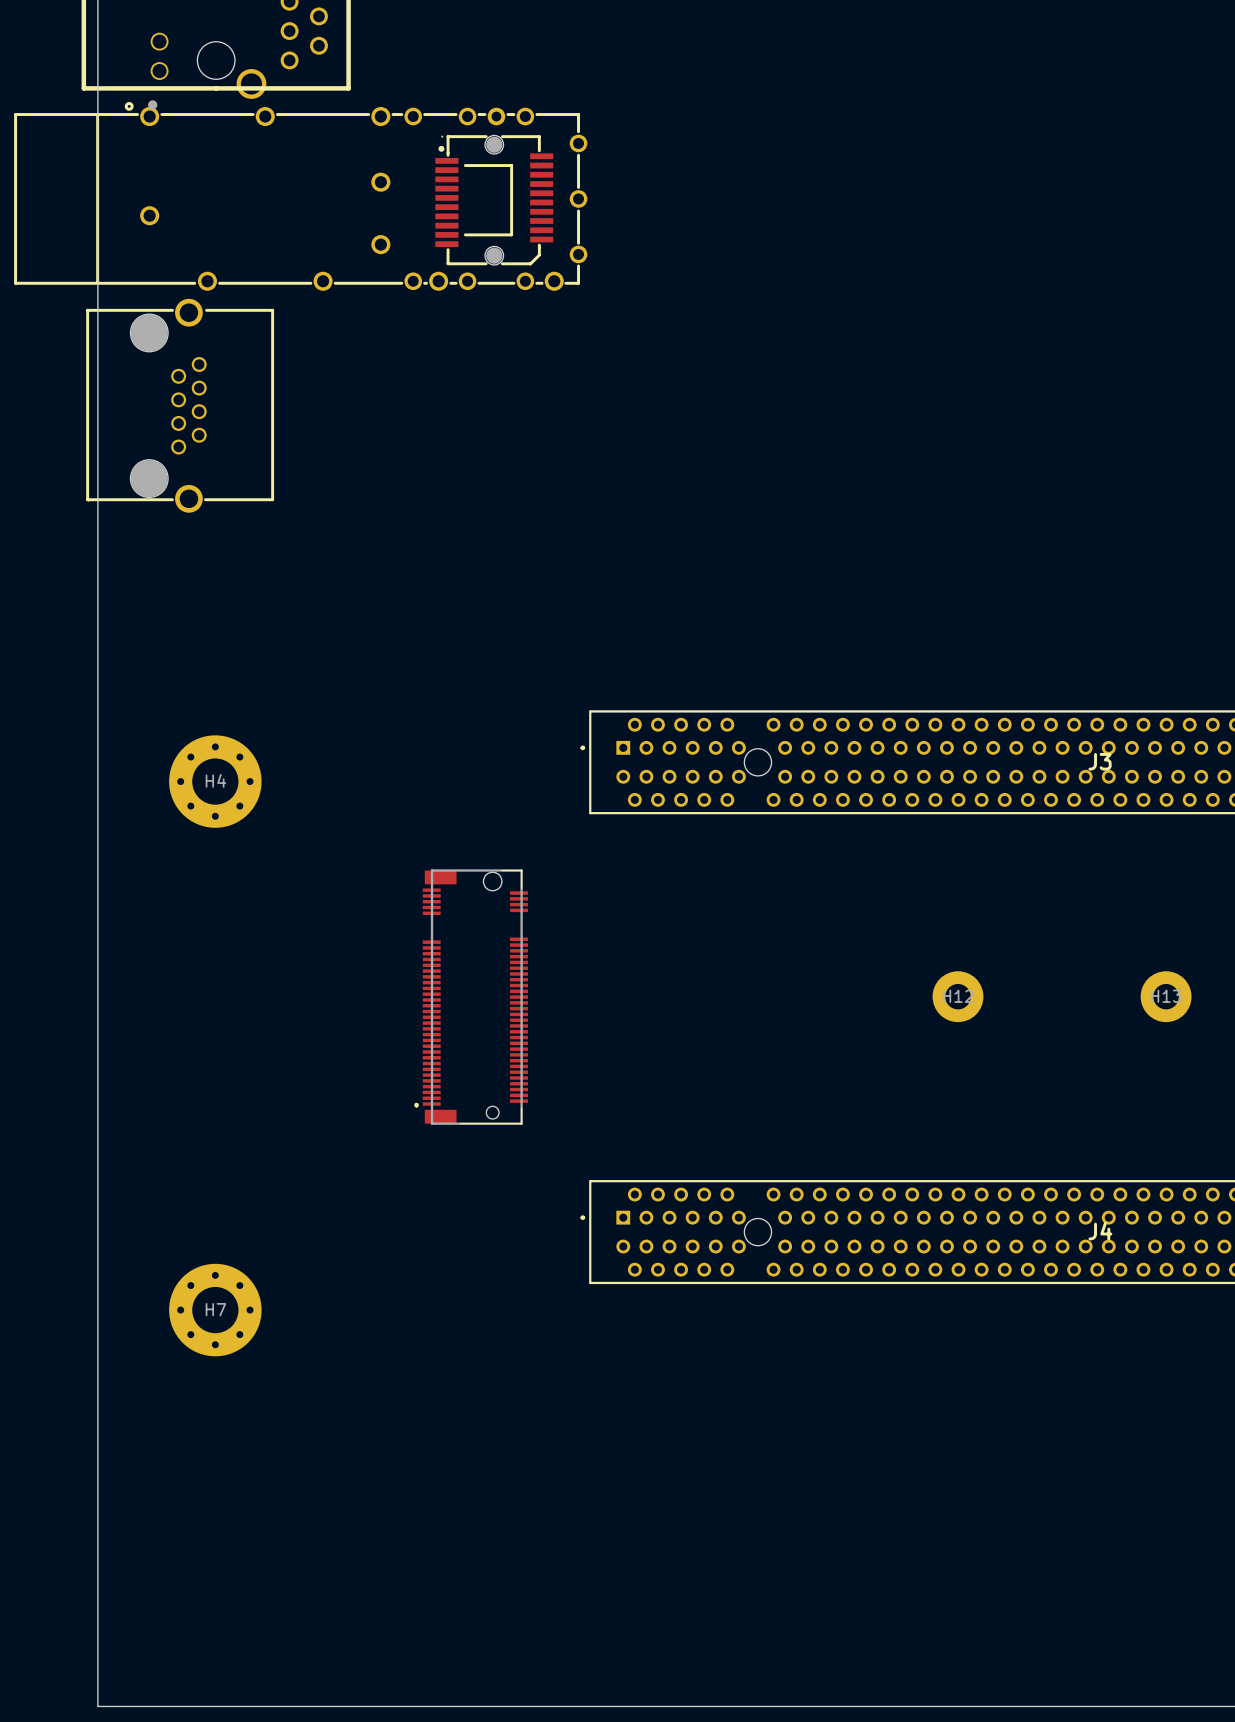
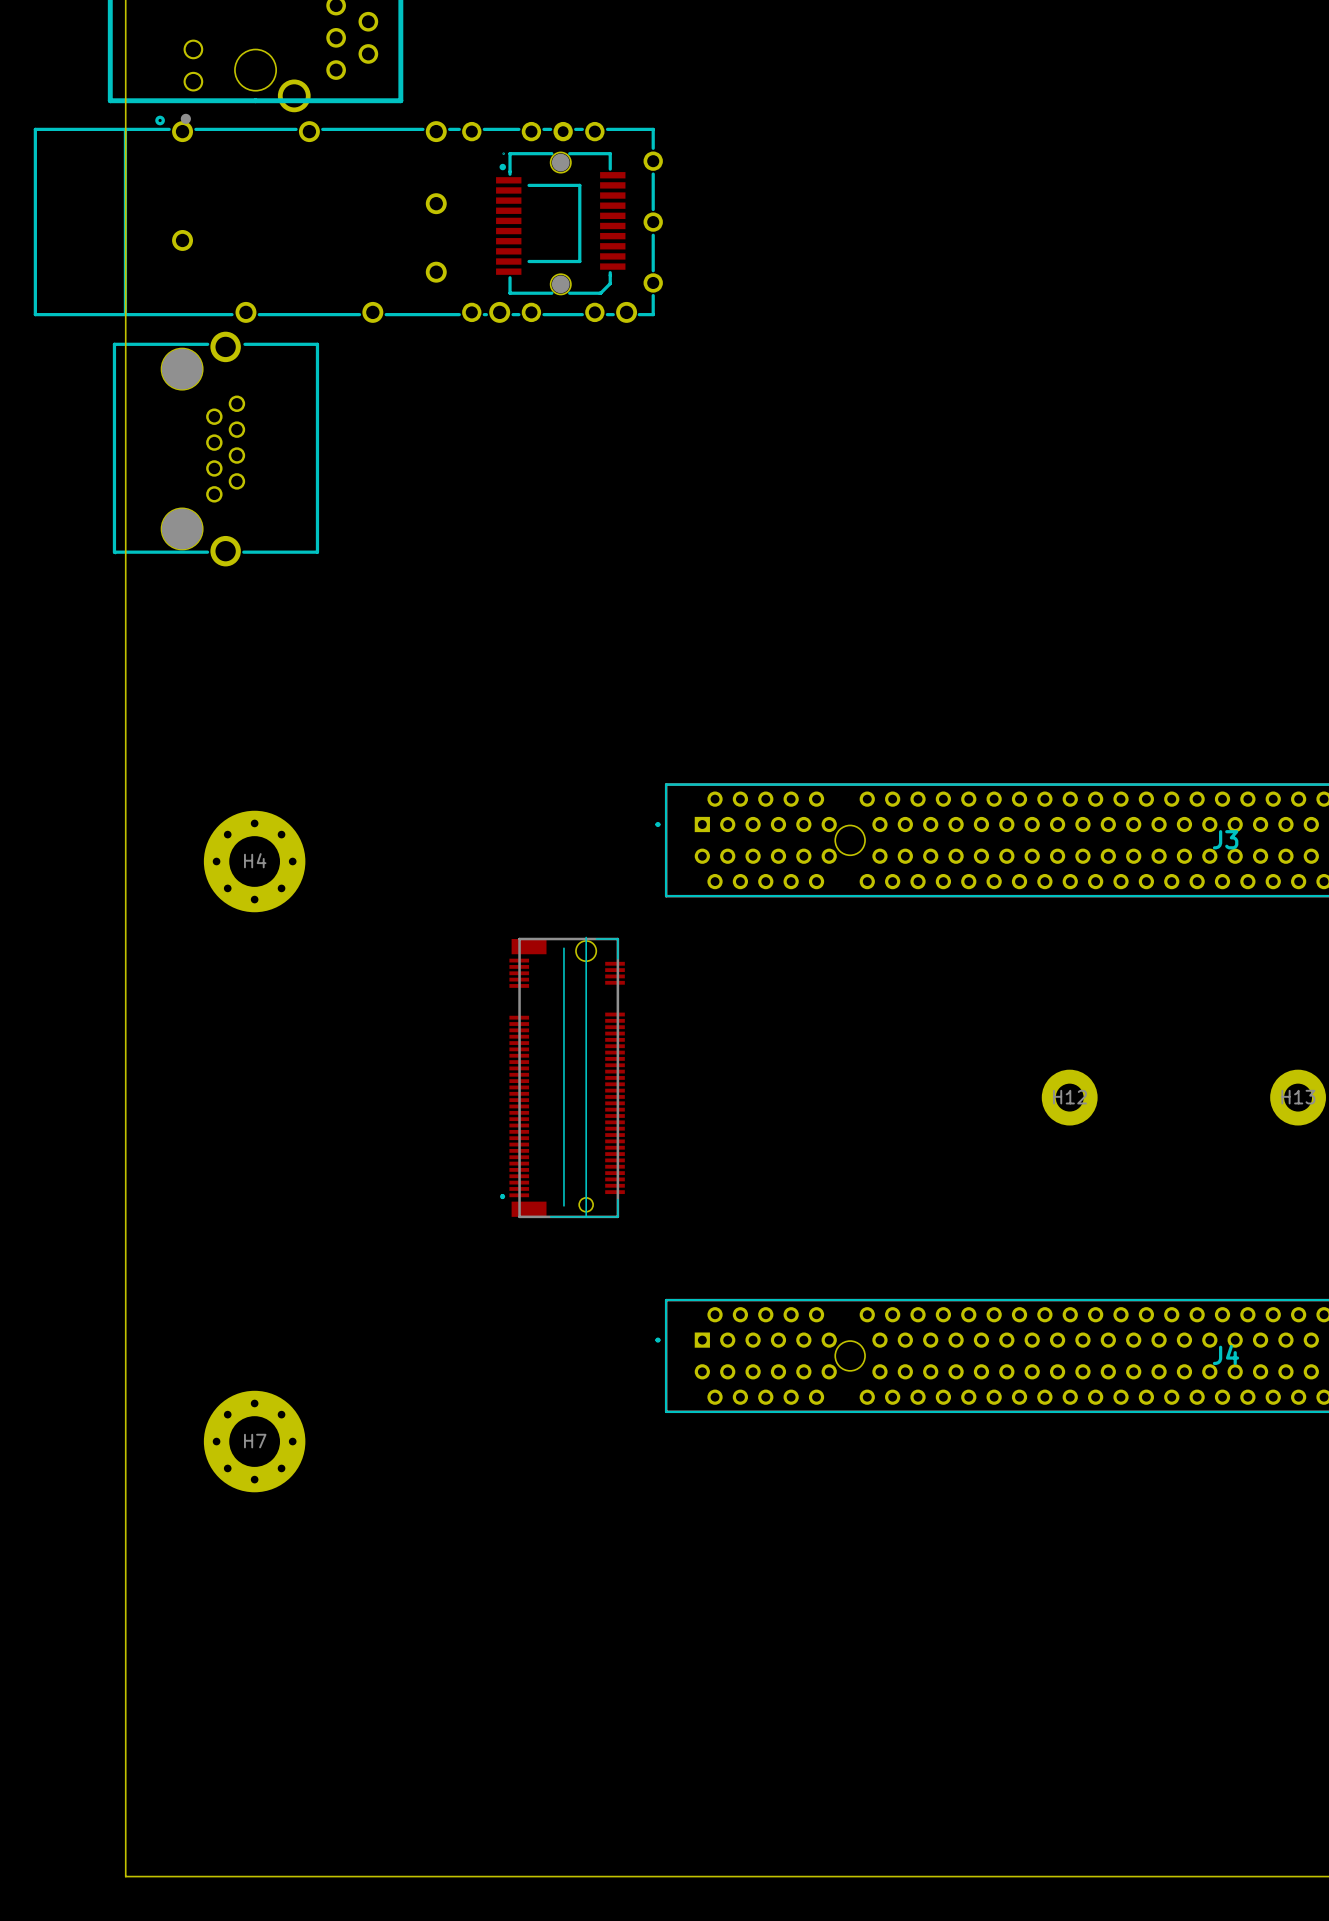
line: none -> (586, 937) (586, 1216)
line: none -> (563, 948) (563, 1205)
part position: (471, 997) -> (562, 1077)

